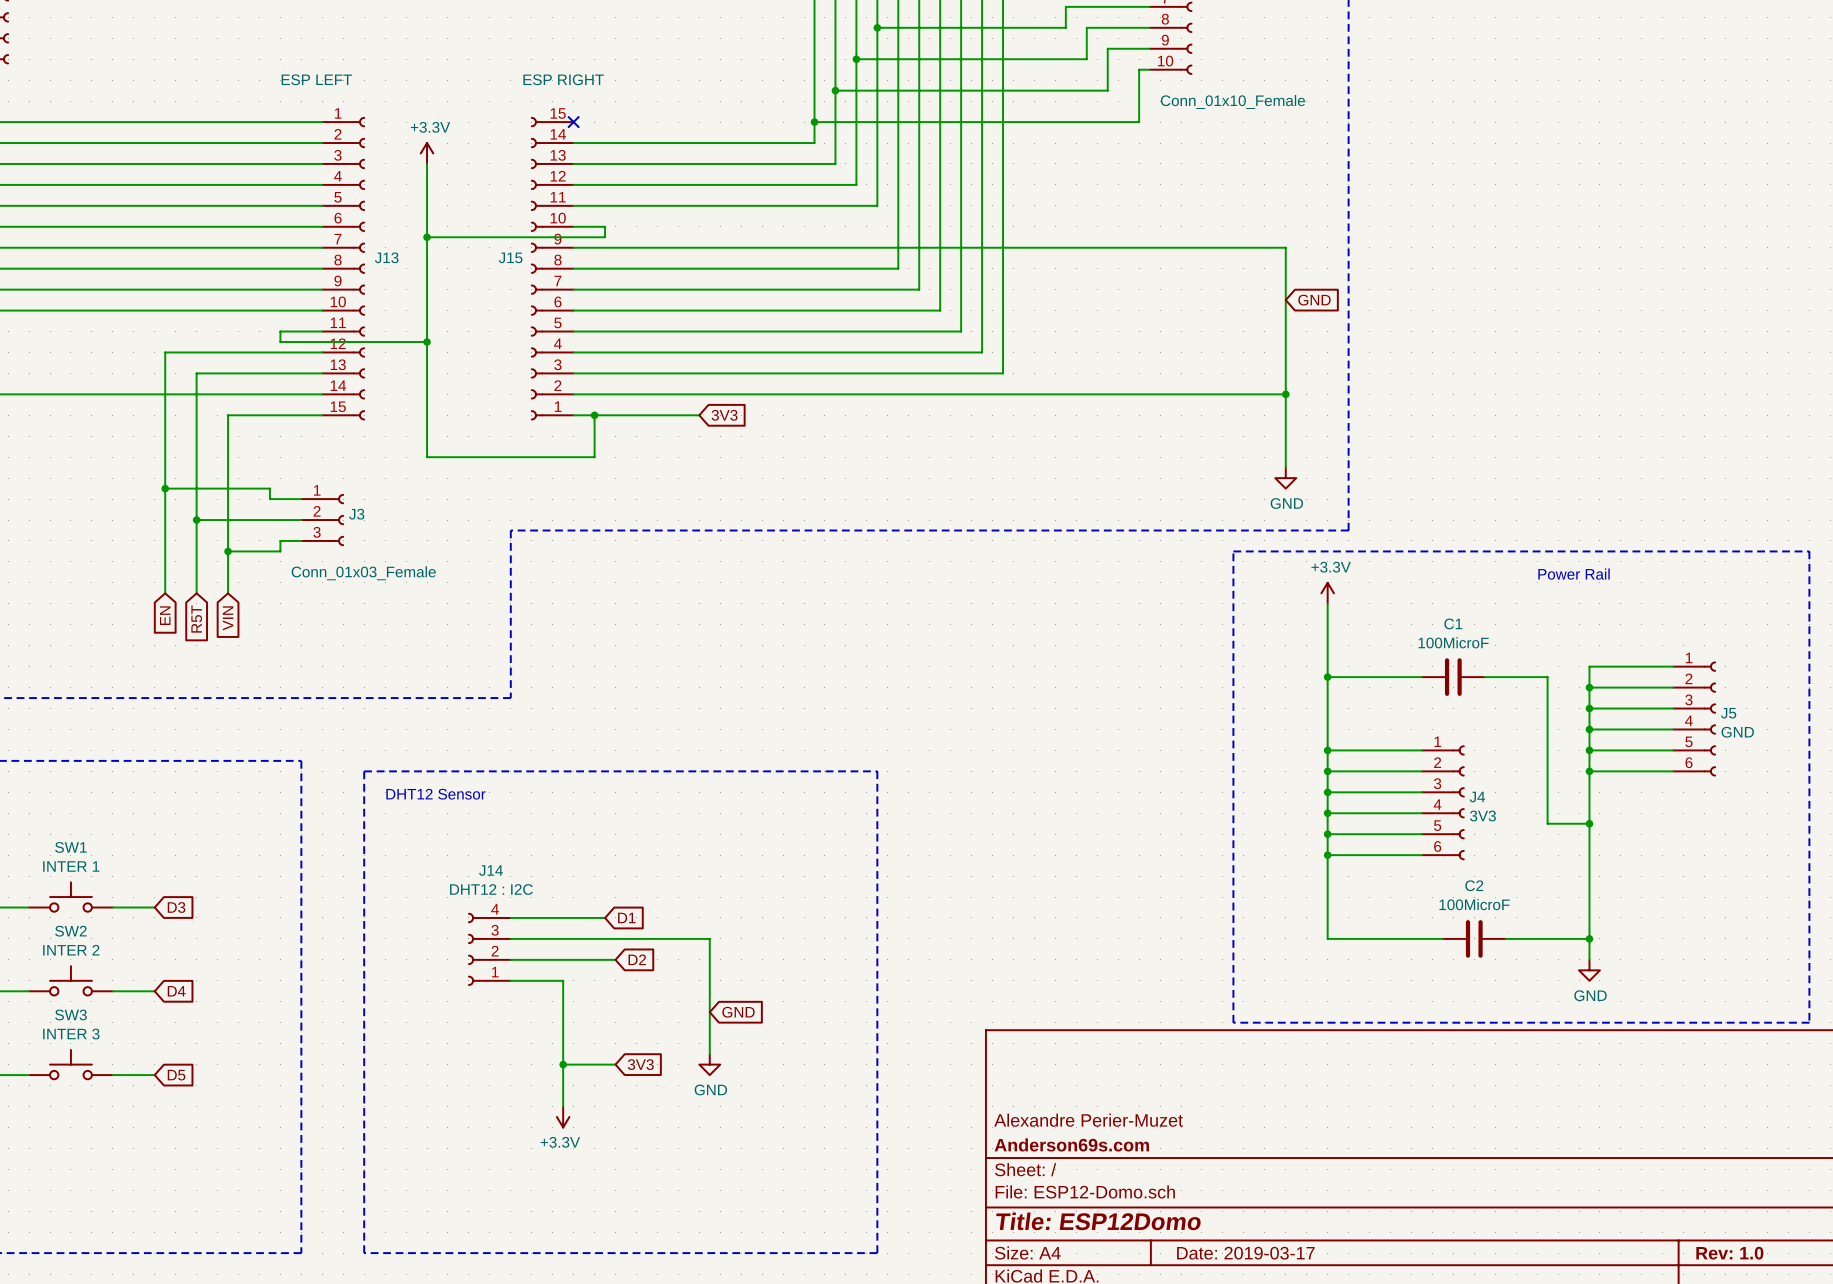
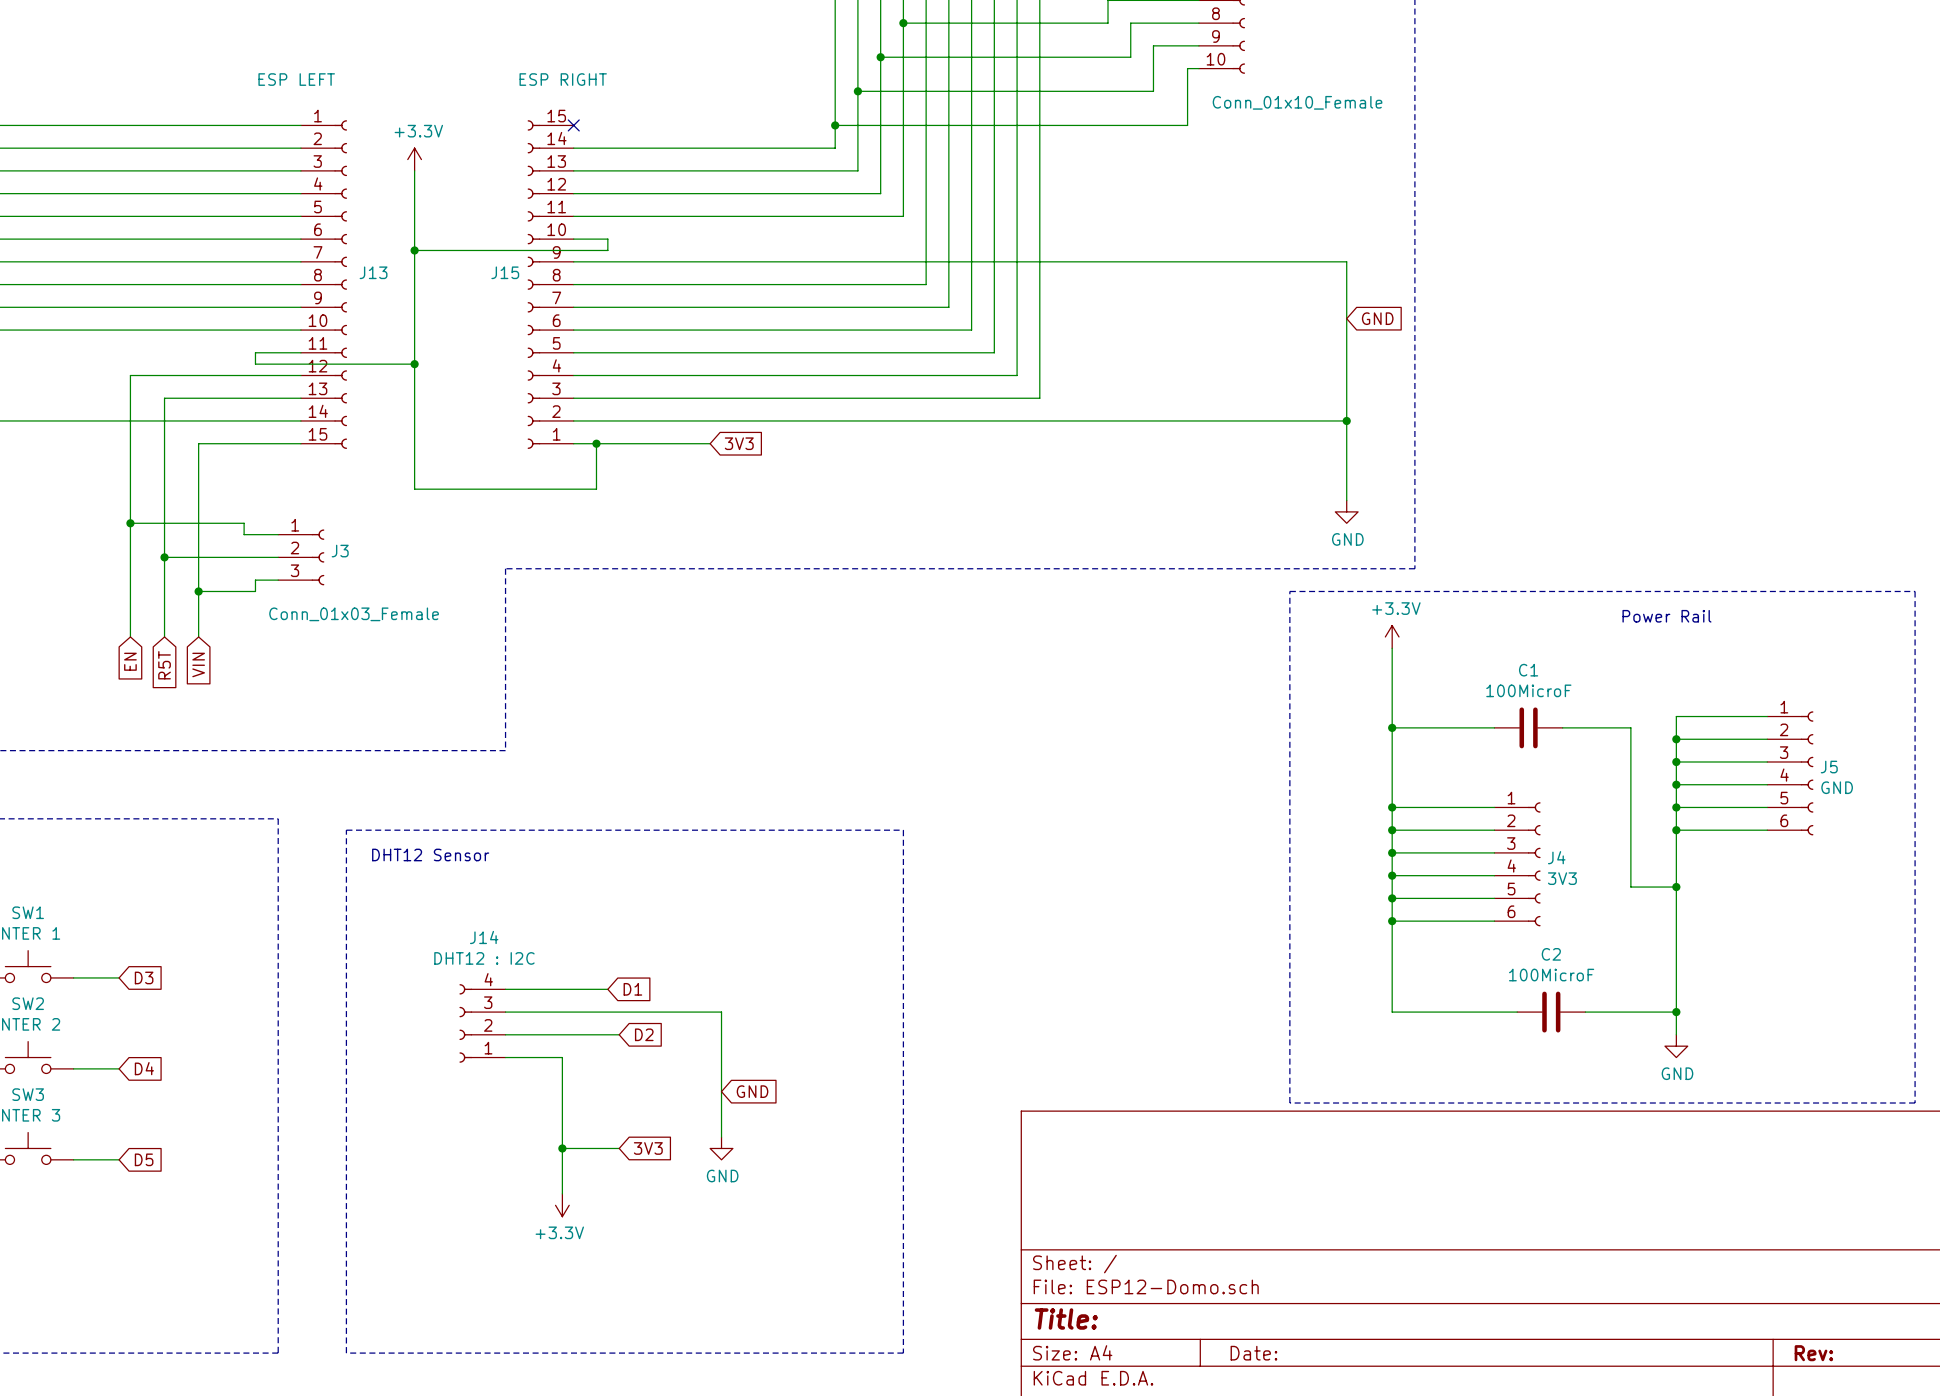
title block: Alexandre Perier-Muzet (1088, 1120) -> none
title block: Anderson69s.com (1071, 1144) -> none
title block: Title: ESP12Domo (1098, 1221) -> Title: (1066, 1319)
title block: Date: 2019-03-17 (1245, 1253) -> Date: (1253, 1353)
title block: Rev: 1.0 (1729, 1253) -> Rev: (1813, 1353)

